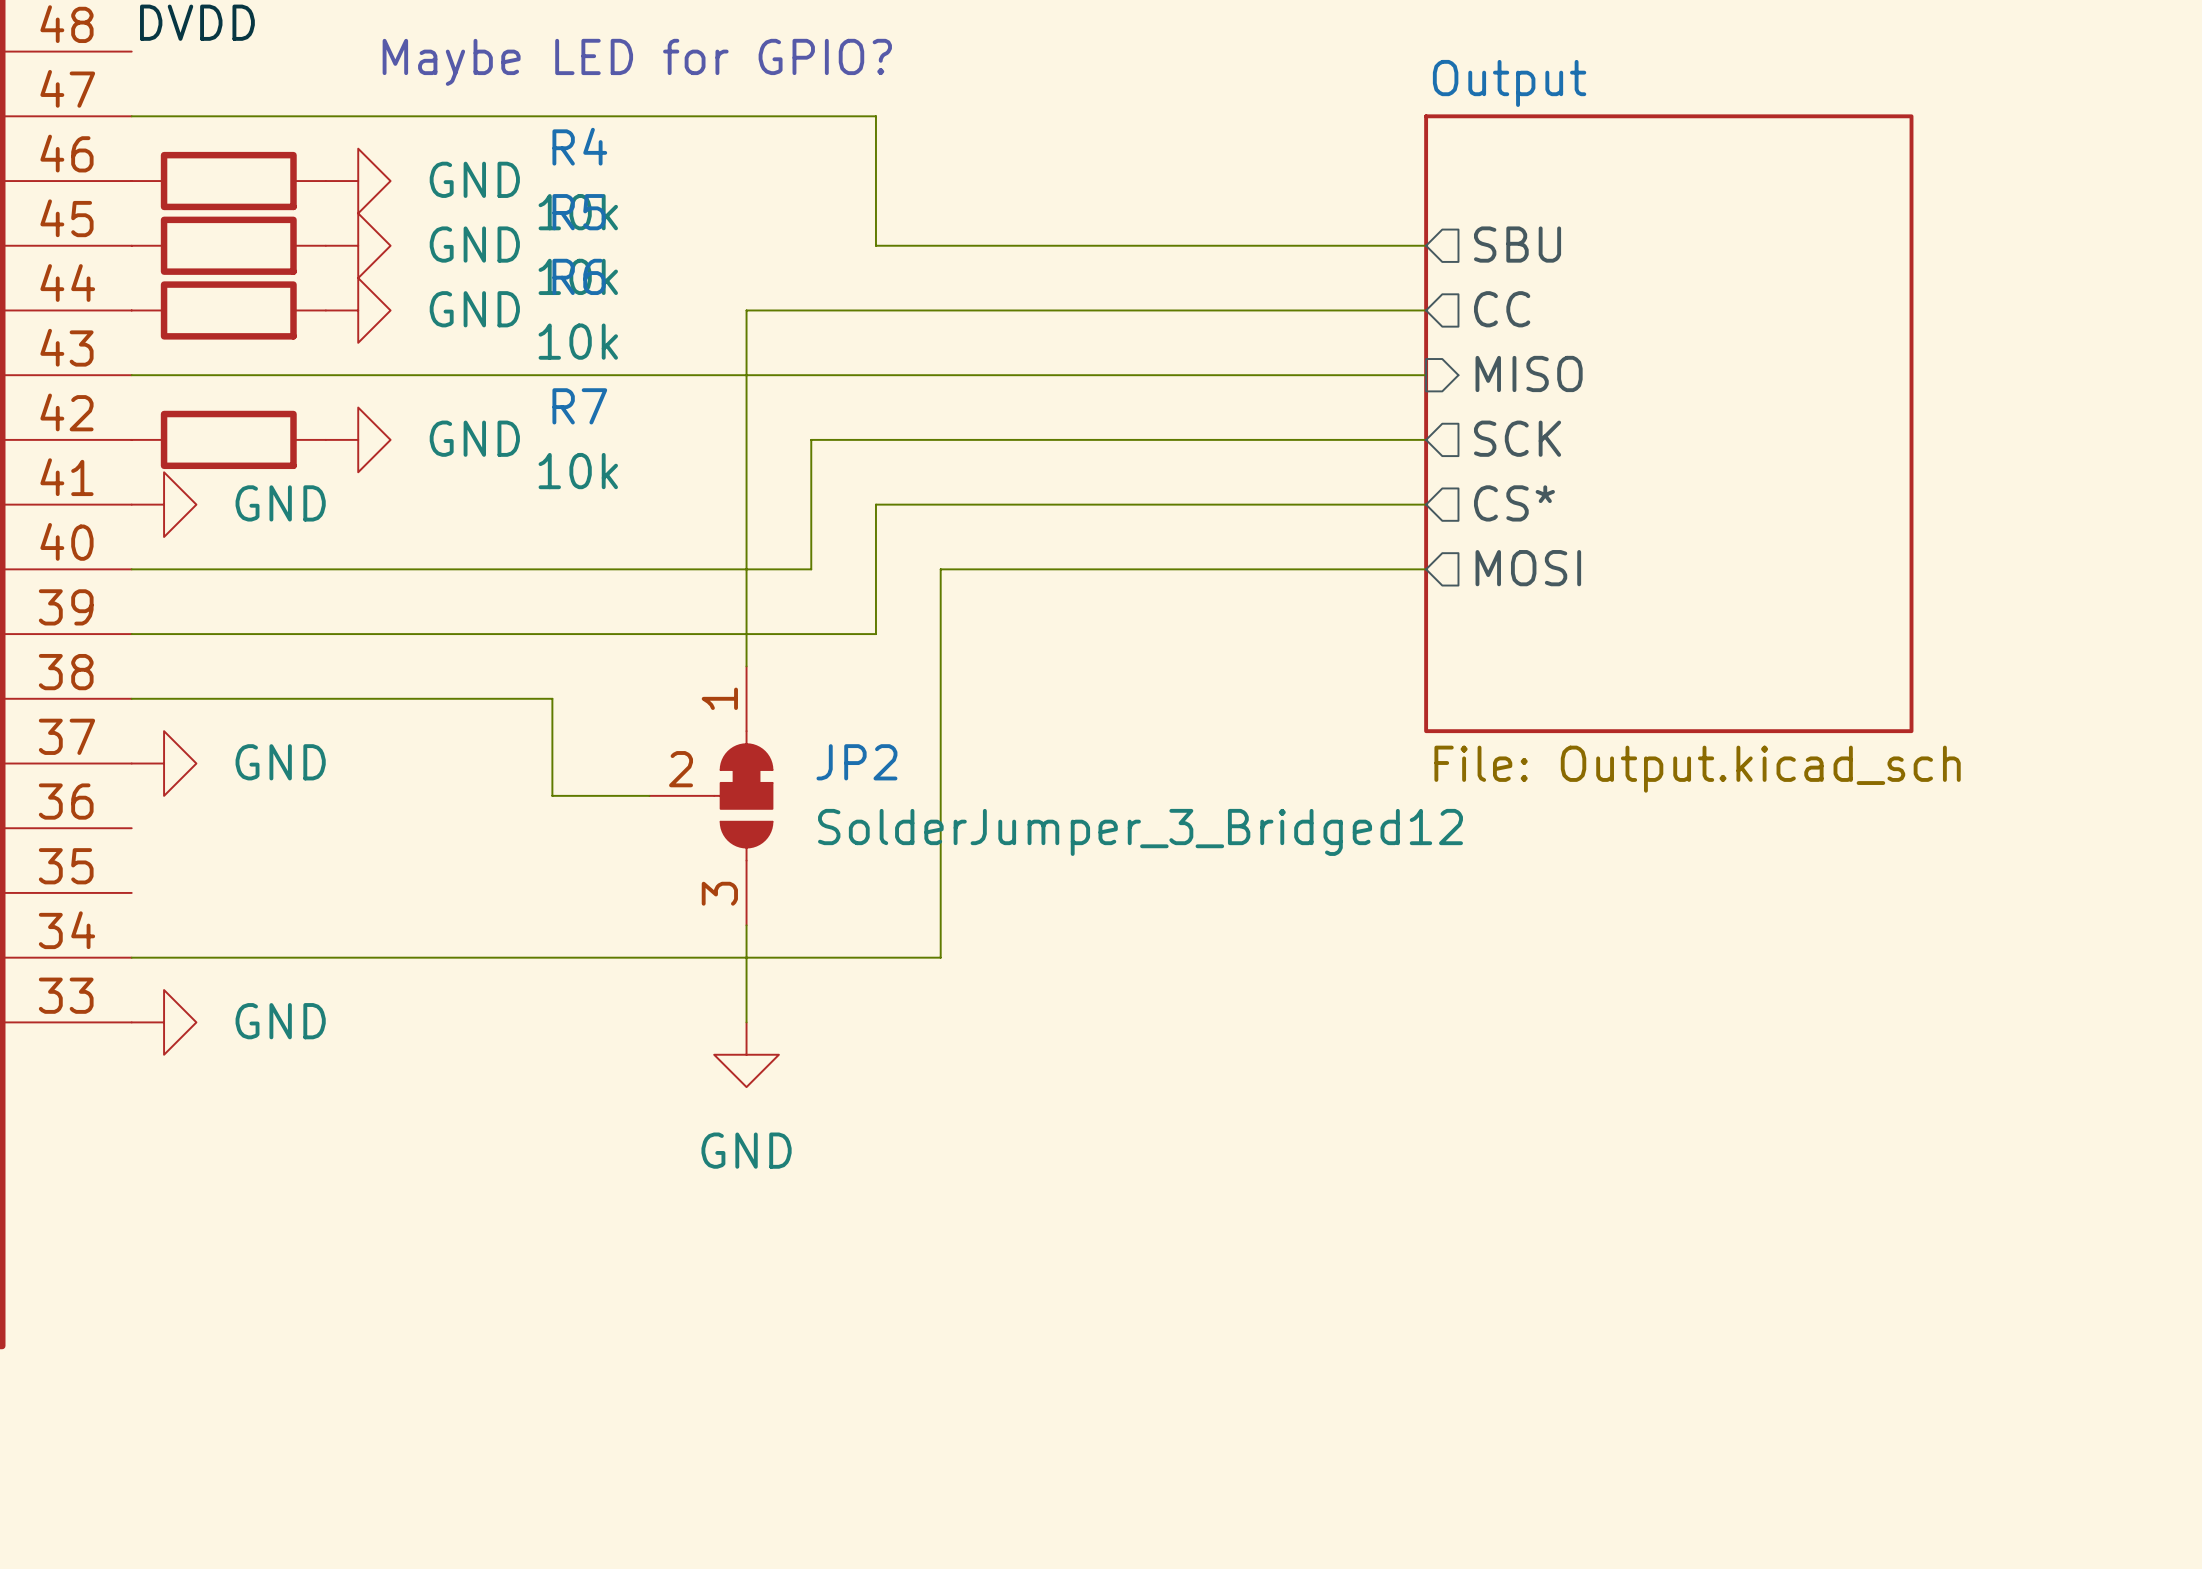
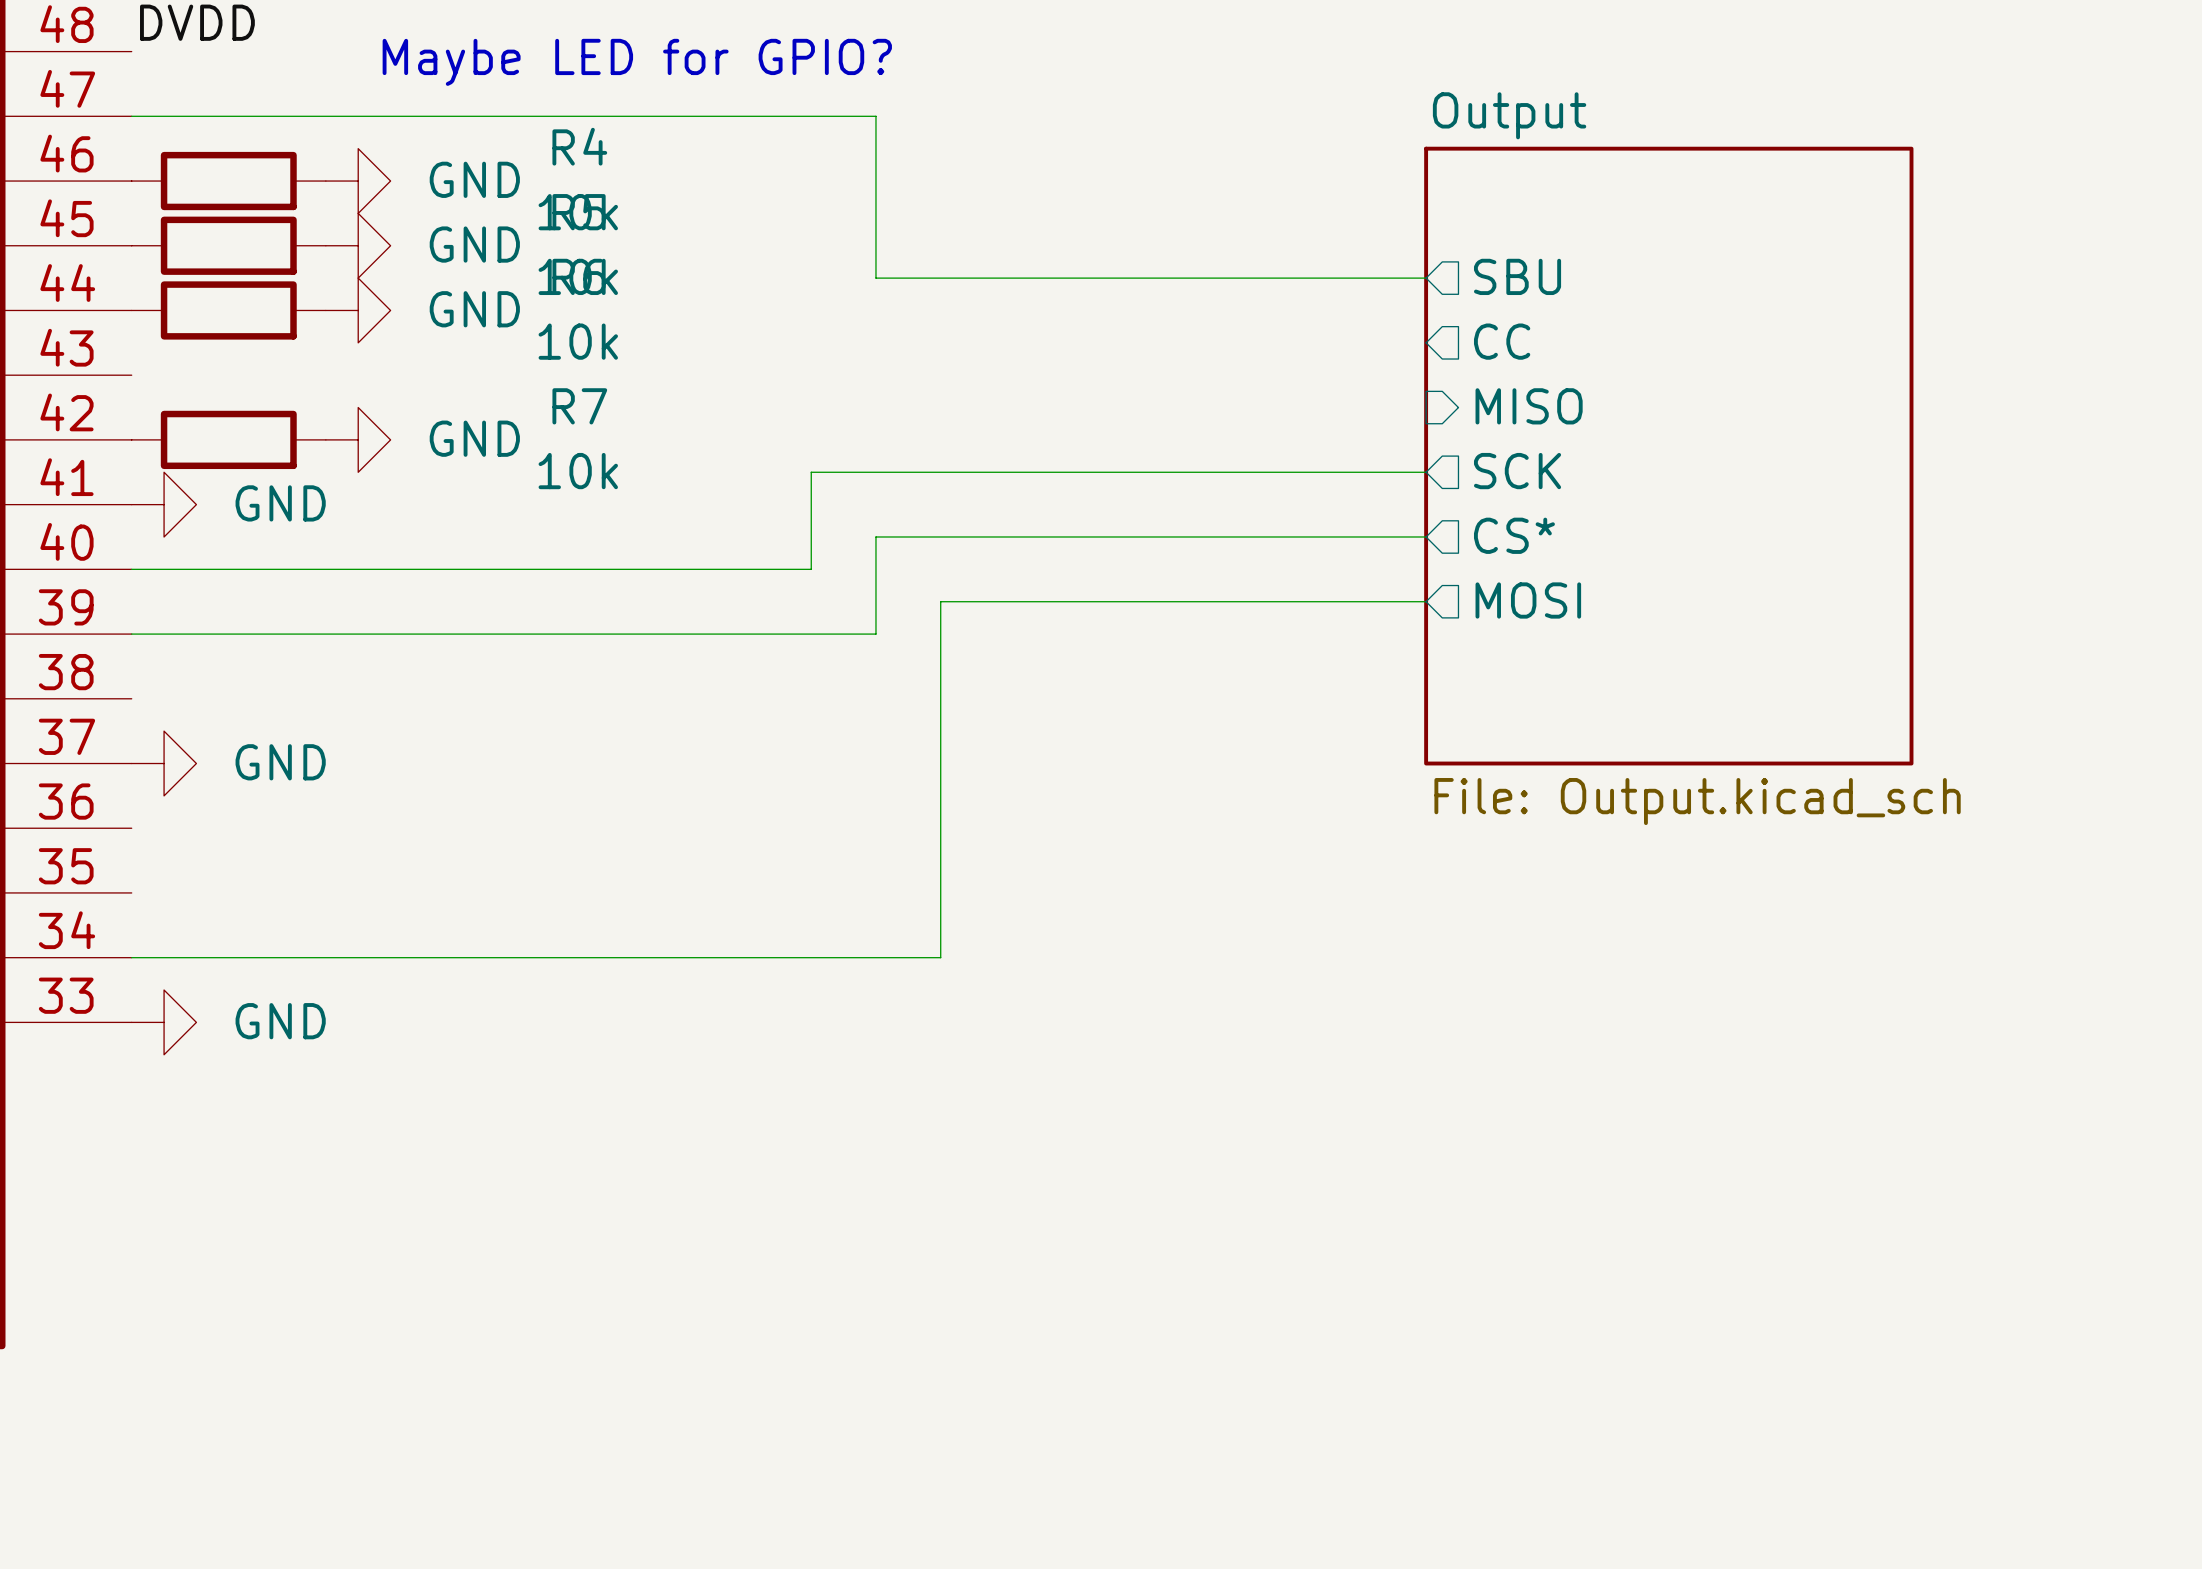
sheet pin position: SBU (1517, 244) -> SBU (1517, 276)
wire: (875, 245) (1426, 245) -> (875, 245) (875, 278) (1426, 278)
sheet pin position: CC (1502, 309) -> CC (1502, 341)
wire: (1426, 310) (746, 310) (746, 666) -> none
sheet pin position: MISO (1529, 373) -> MISO (1529, 406)
wire: (131, 375) (1426, 375) -> none
sheet Output position: (1668, 423) -> (1668, 456)
sheet pin position: SCK (1517, 438) -> SCK (1517, 471)
wire: (1426, 439) (811, 439) (811, 472) -> (1426, 472) (811, 472)
sheet pin position: CS* (1514, 503) -> CS* (1514, 535)
wire: (1426, 504) (875, 504) (875, 536) -> (1426, 536) (875, 536)
sheet pin position: MOSI (1528, 568) -> MOSI (1528, 600)
wire: (1426, 569) (940, 569) (940, 601) -> (1426, 601) (940, 601)
wire: (131, 698) (552, 698) (552, 795) (649, 795) -> none
JP2: SolderJumper_3_Bridged12 (710, 795) -> none
wire: (746, 925) (746, 1022) -> none
power symbol: GND (746, 1054) -> none

